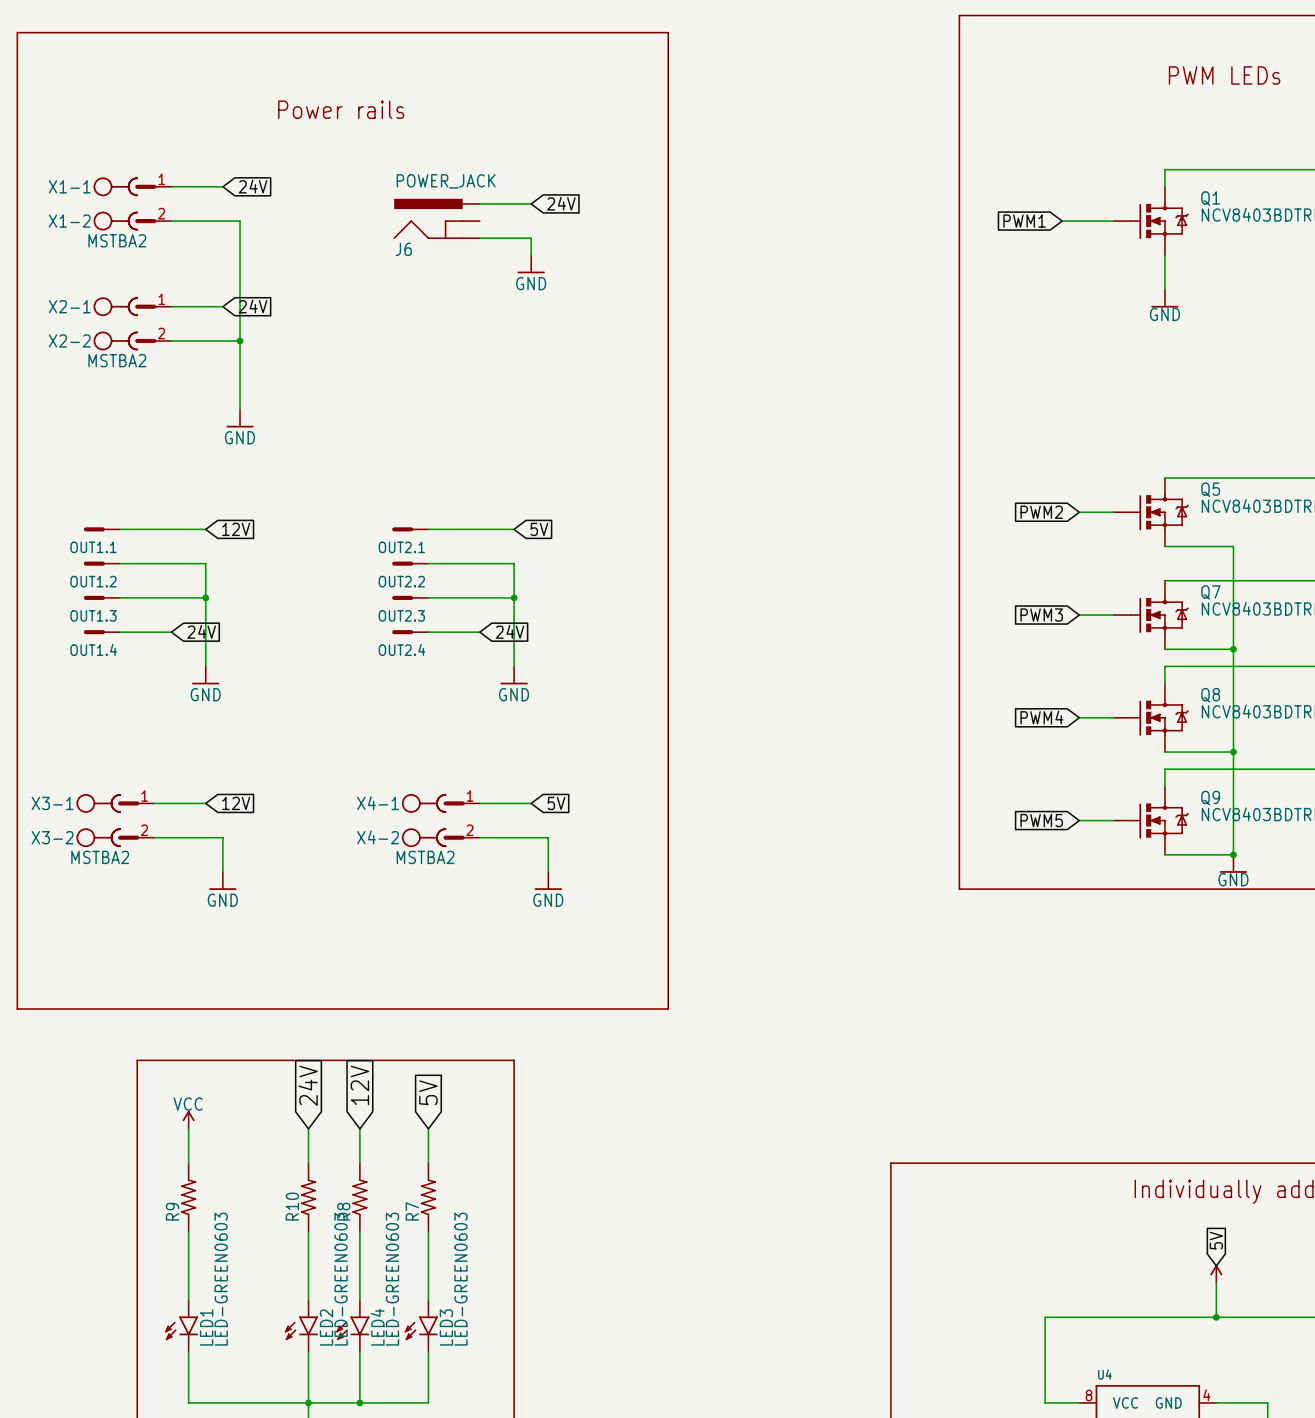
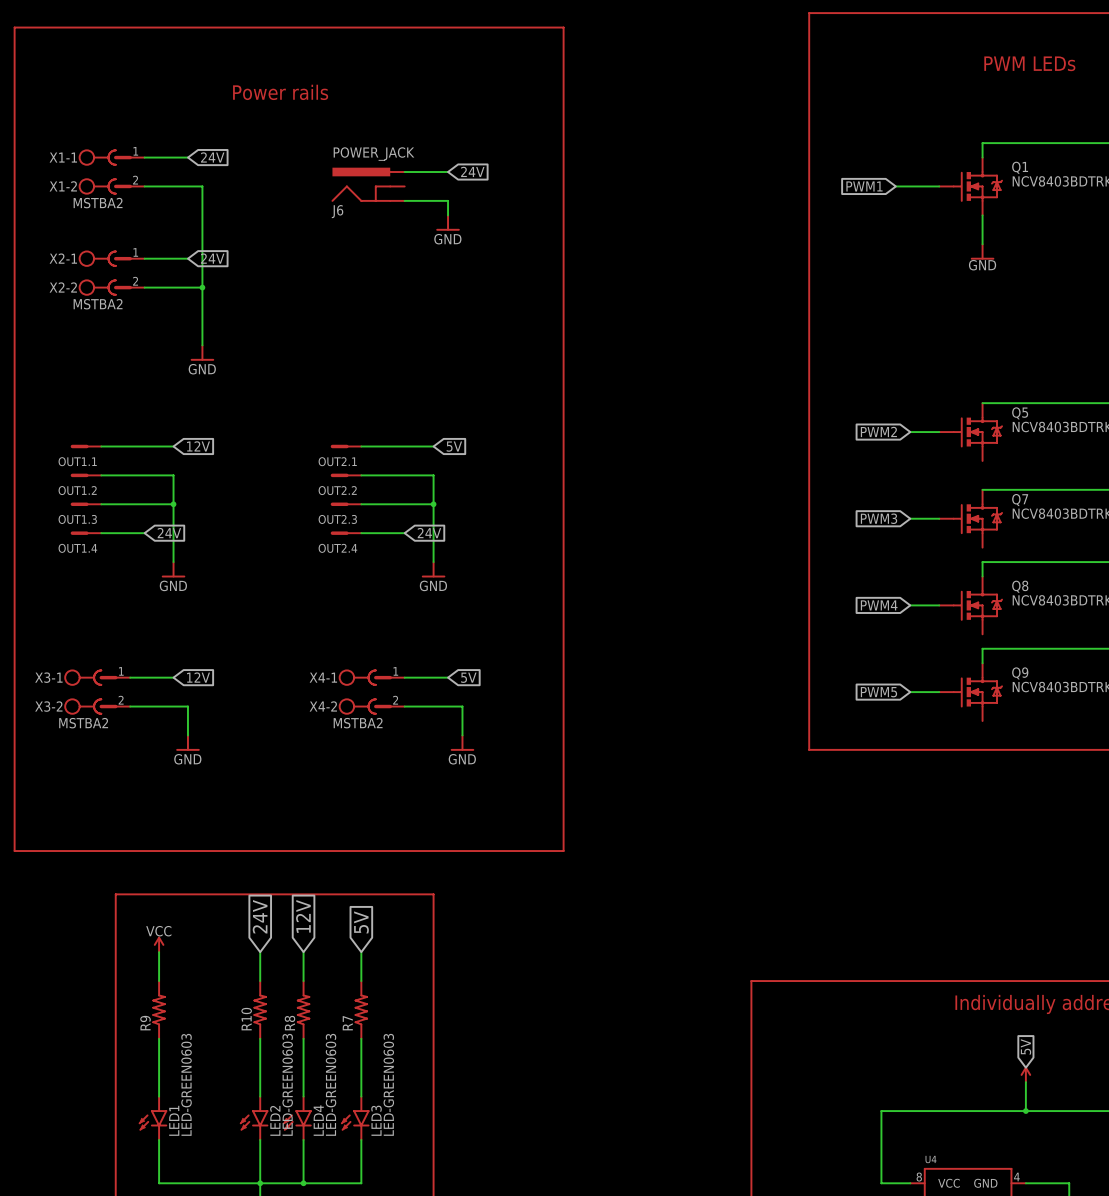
wire: (1164, 546) (1233, 546) (1233, 854) (1164, 854) -> none
wire: (1164, 649) (1233, 649) -> none
junction: (1233, 649) -> none
wire: (1164, 752) (1233, 752) -> none
junction: (1233, 752) -> none
junction: (1233, 854) -> none
power symbol: GND (1233, 863) -> none

